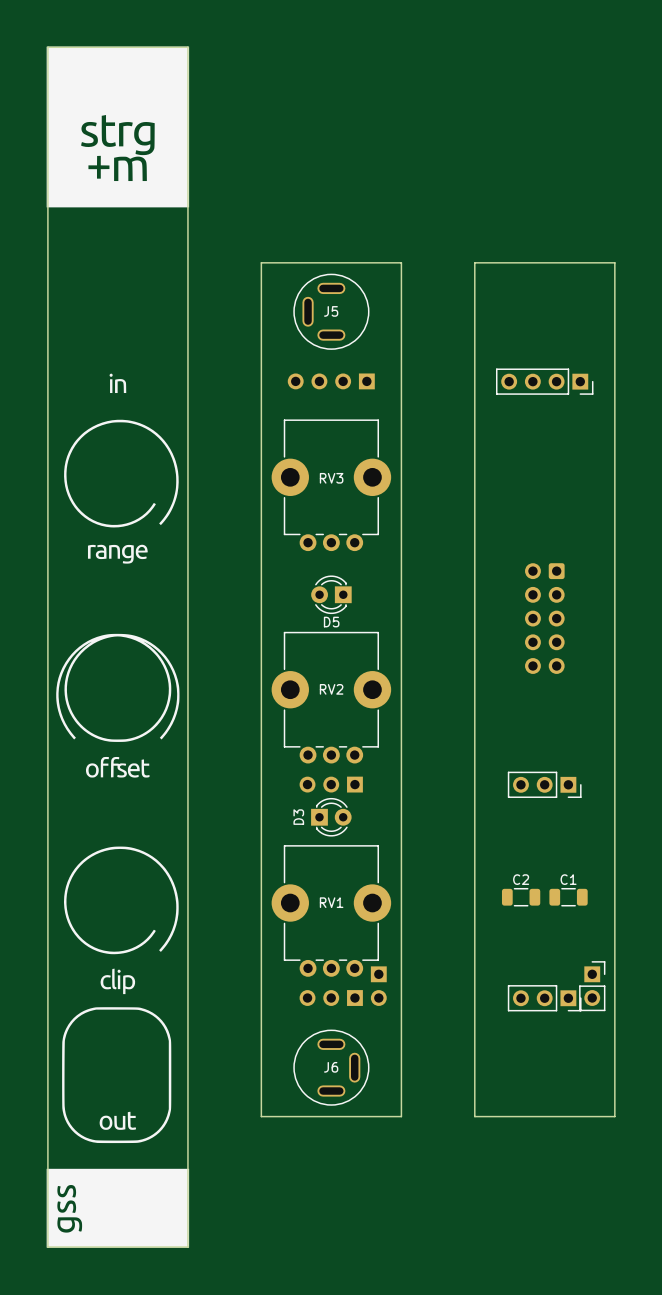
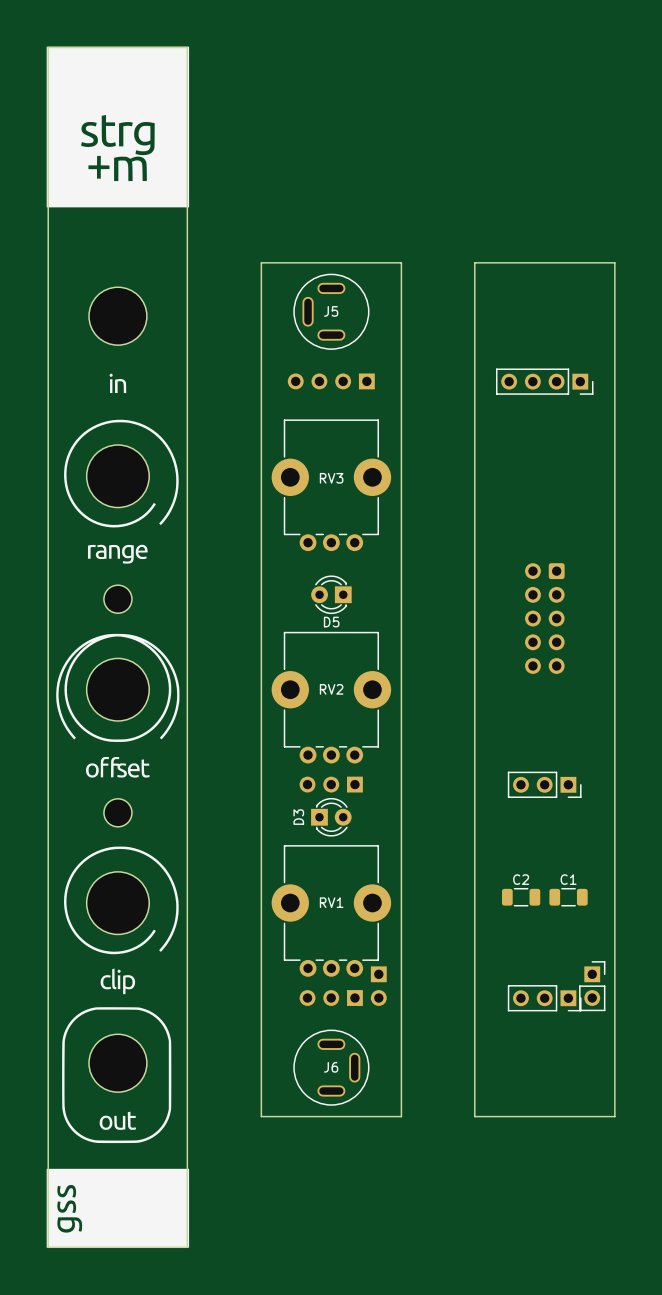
board edge: (47, 47) (187, 47) (187, 1247) (47, 1247) (47, 47) -> none
part: none -> (117, 316)
part: none -> (117, 476)
part: none -> (117, 599)
part: none -> (117, 647)
part: none -> (117, 689)
part: none -> (117, 812)
part: none -> (117, 903)
part: none -> (117, 1063)

